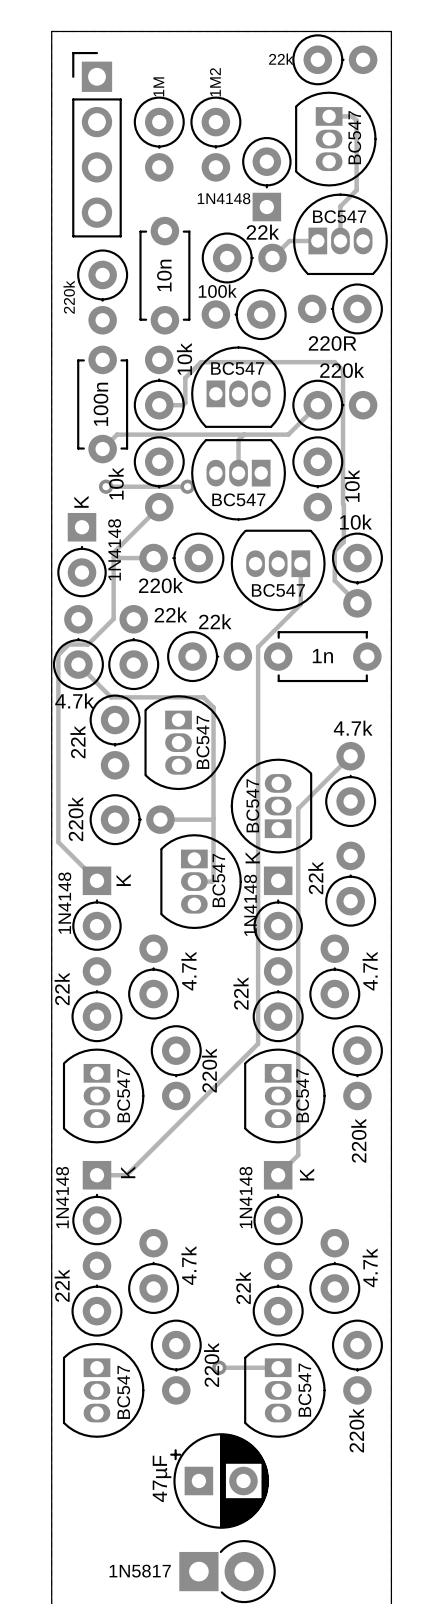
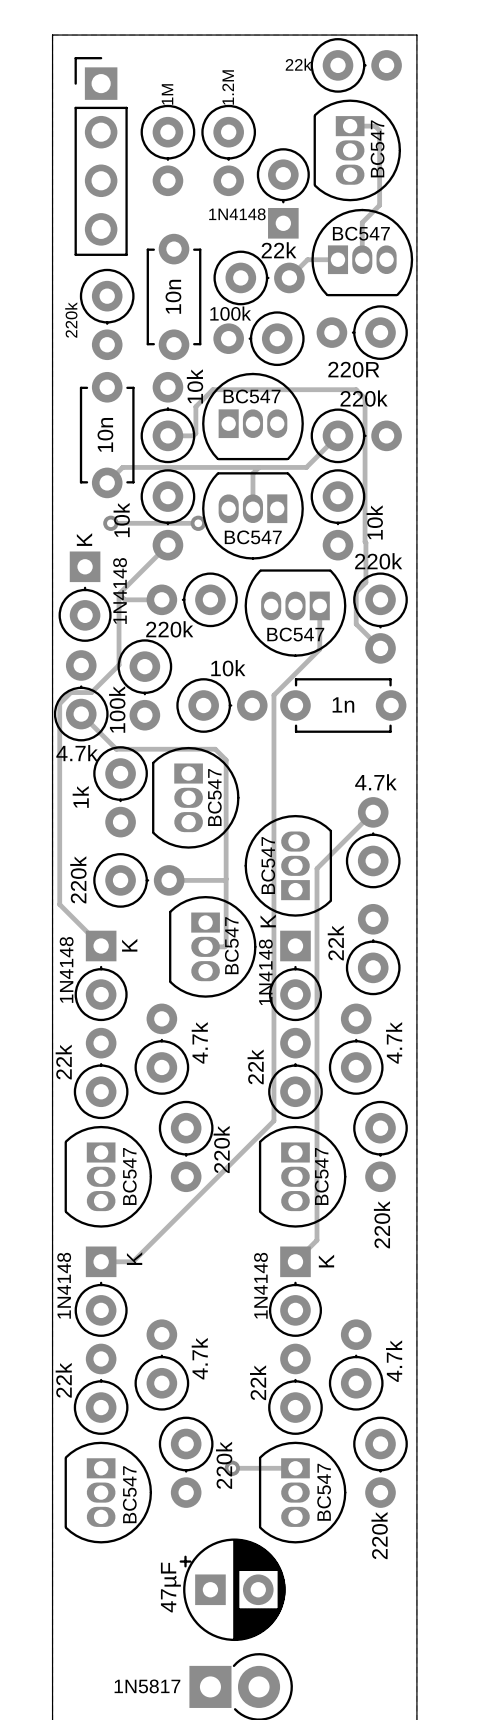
part value: 1M2 (215, 82) -> 1.2M (228, 87)
part value: 100n (100, 404) -> 10n (105, 434)
part value: 10k (355, 522) -> 220k (378, 561)
part value: 22k (170, 614) -> 100k (117, 709)
part value: 22k (215, 621) -> 10k (228, 668)
part rotation: 0° (133, 647) -> 180° (144, 684)
part value: 22k (77, 742) -> 1k (80, 796)

